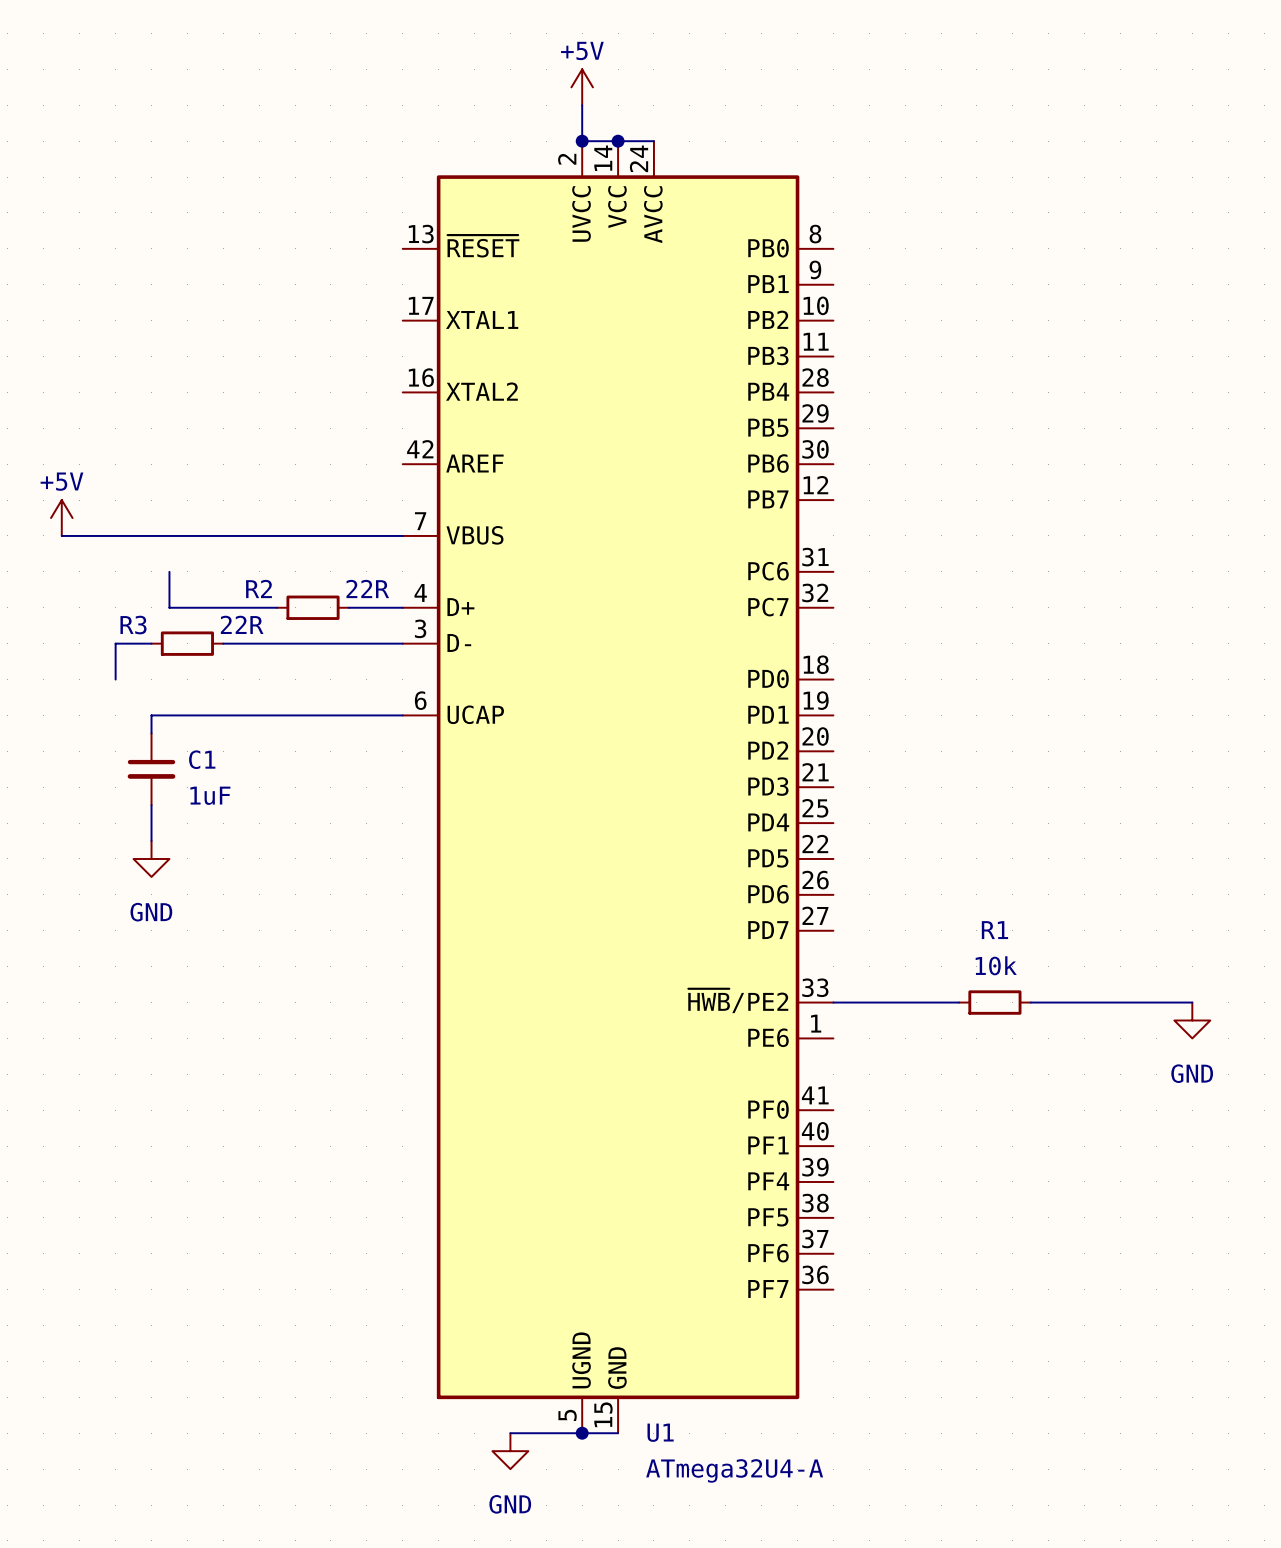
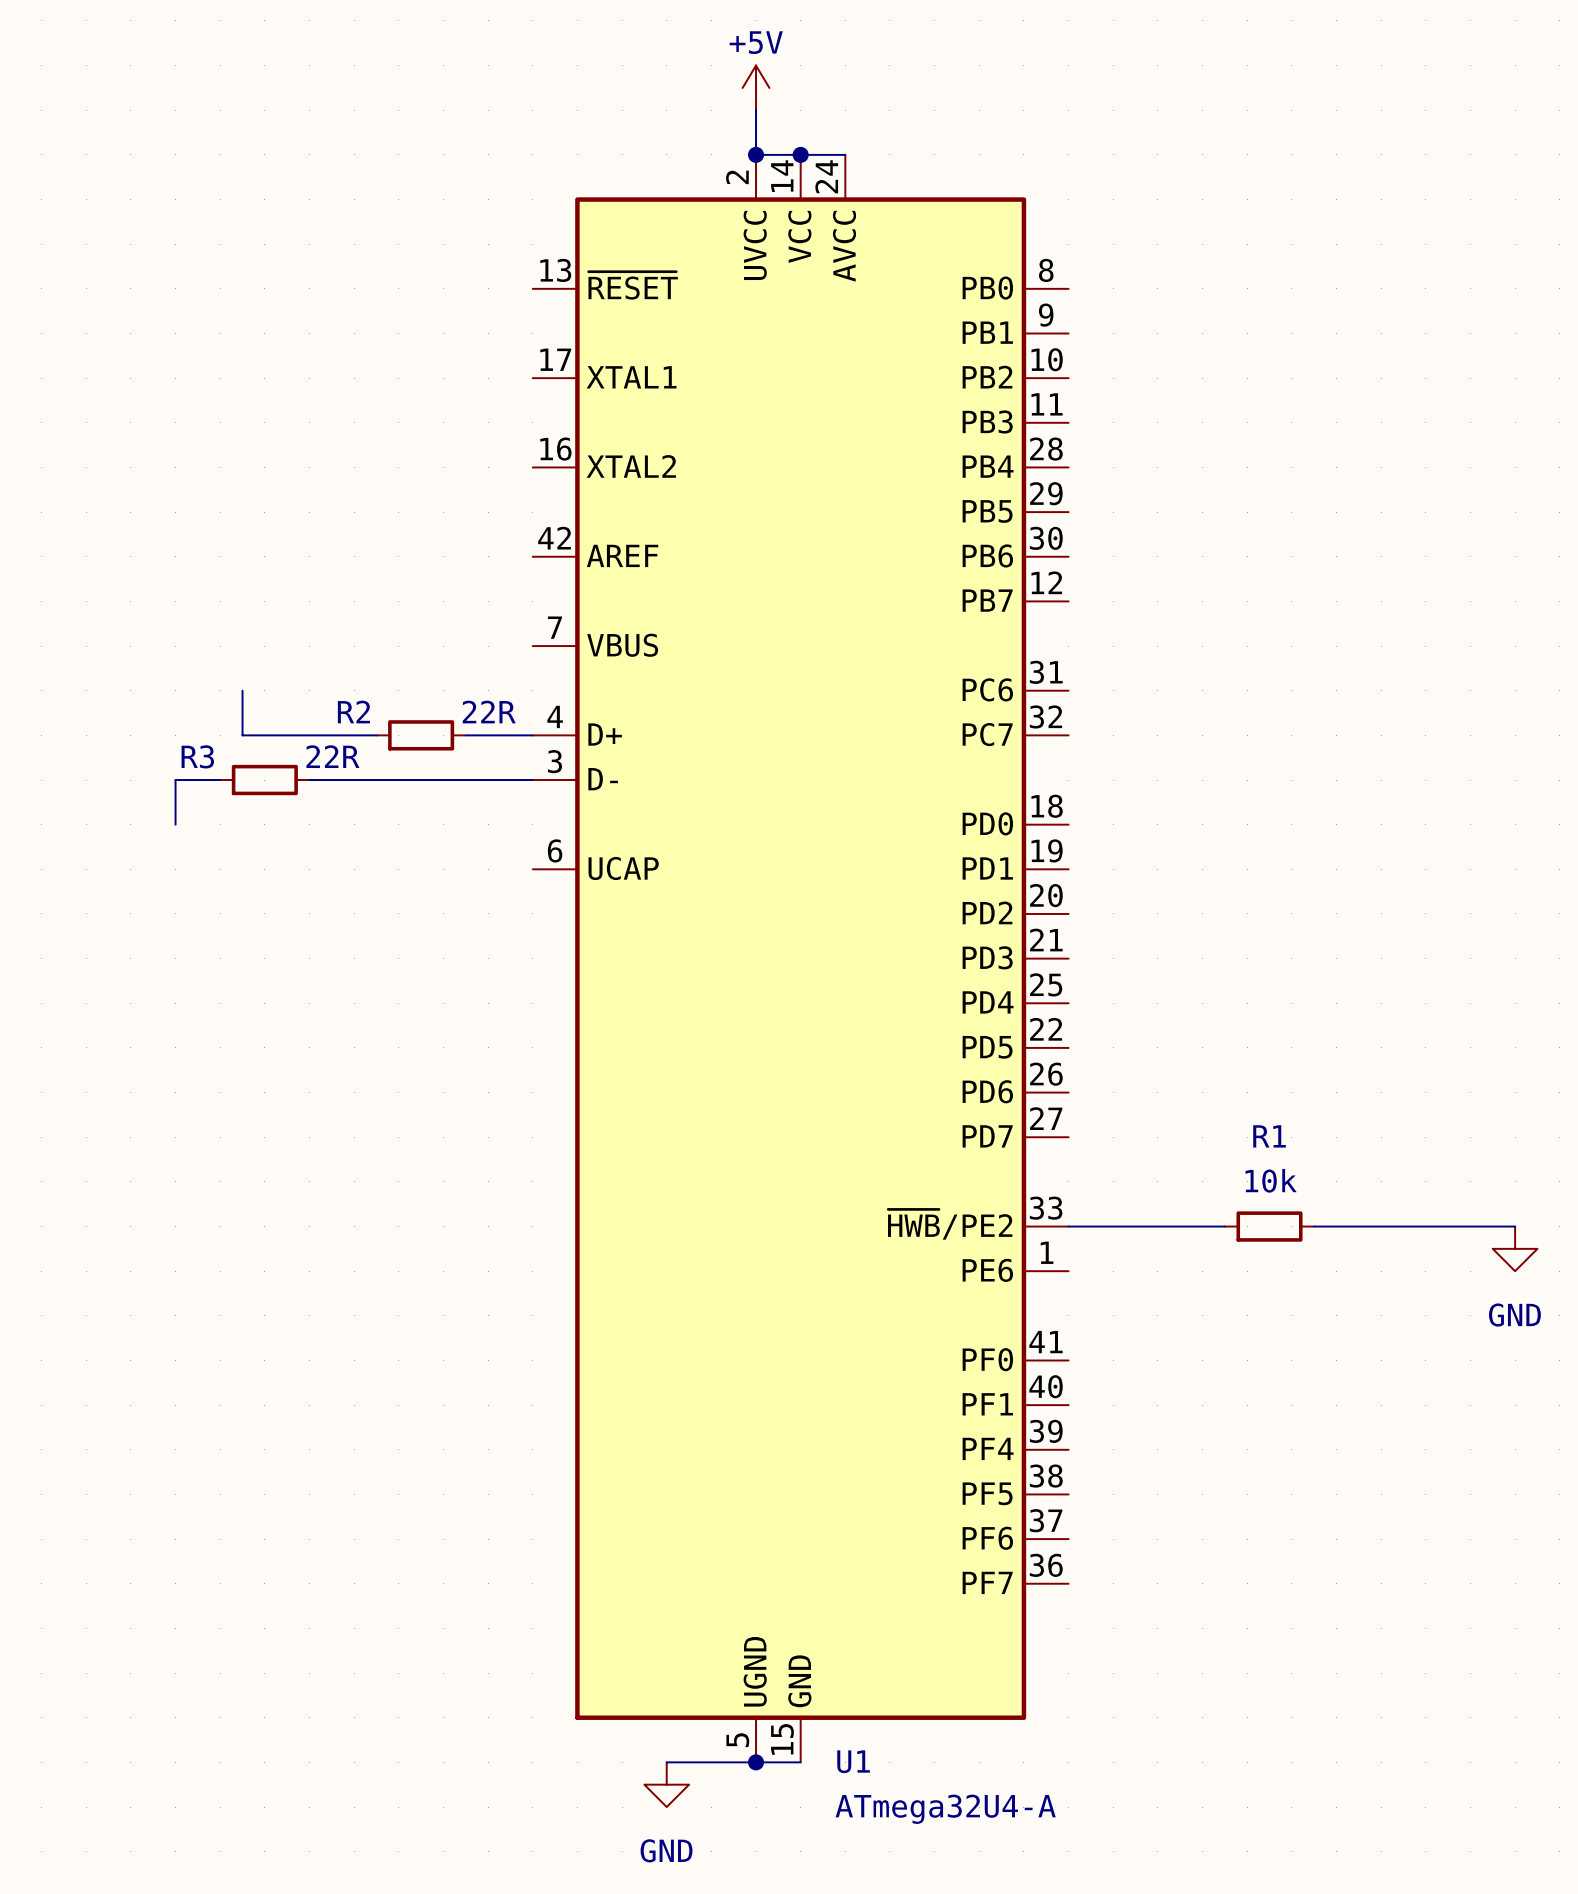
power symbol: +5V (61, 518) -> none
wire: (61, 535) (402, 535) -> none
wire: (402, 715) (151, 715) (151, 733) -> none
C1: 1uF (151, 769) -> none
wire: (151, 805) (151, 841) -> none
power symbol: GND (151, 858) -> none

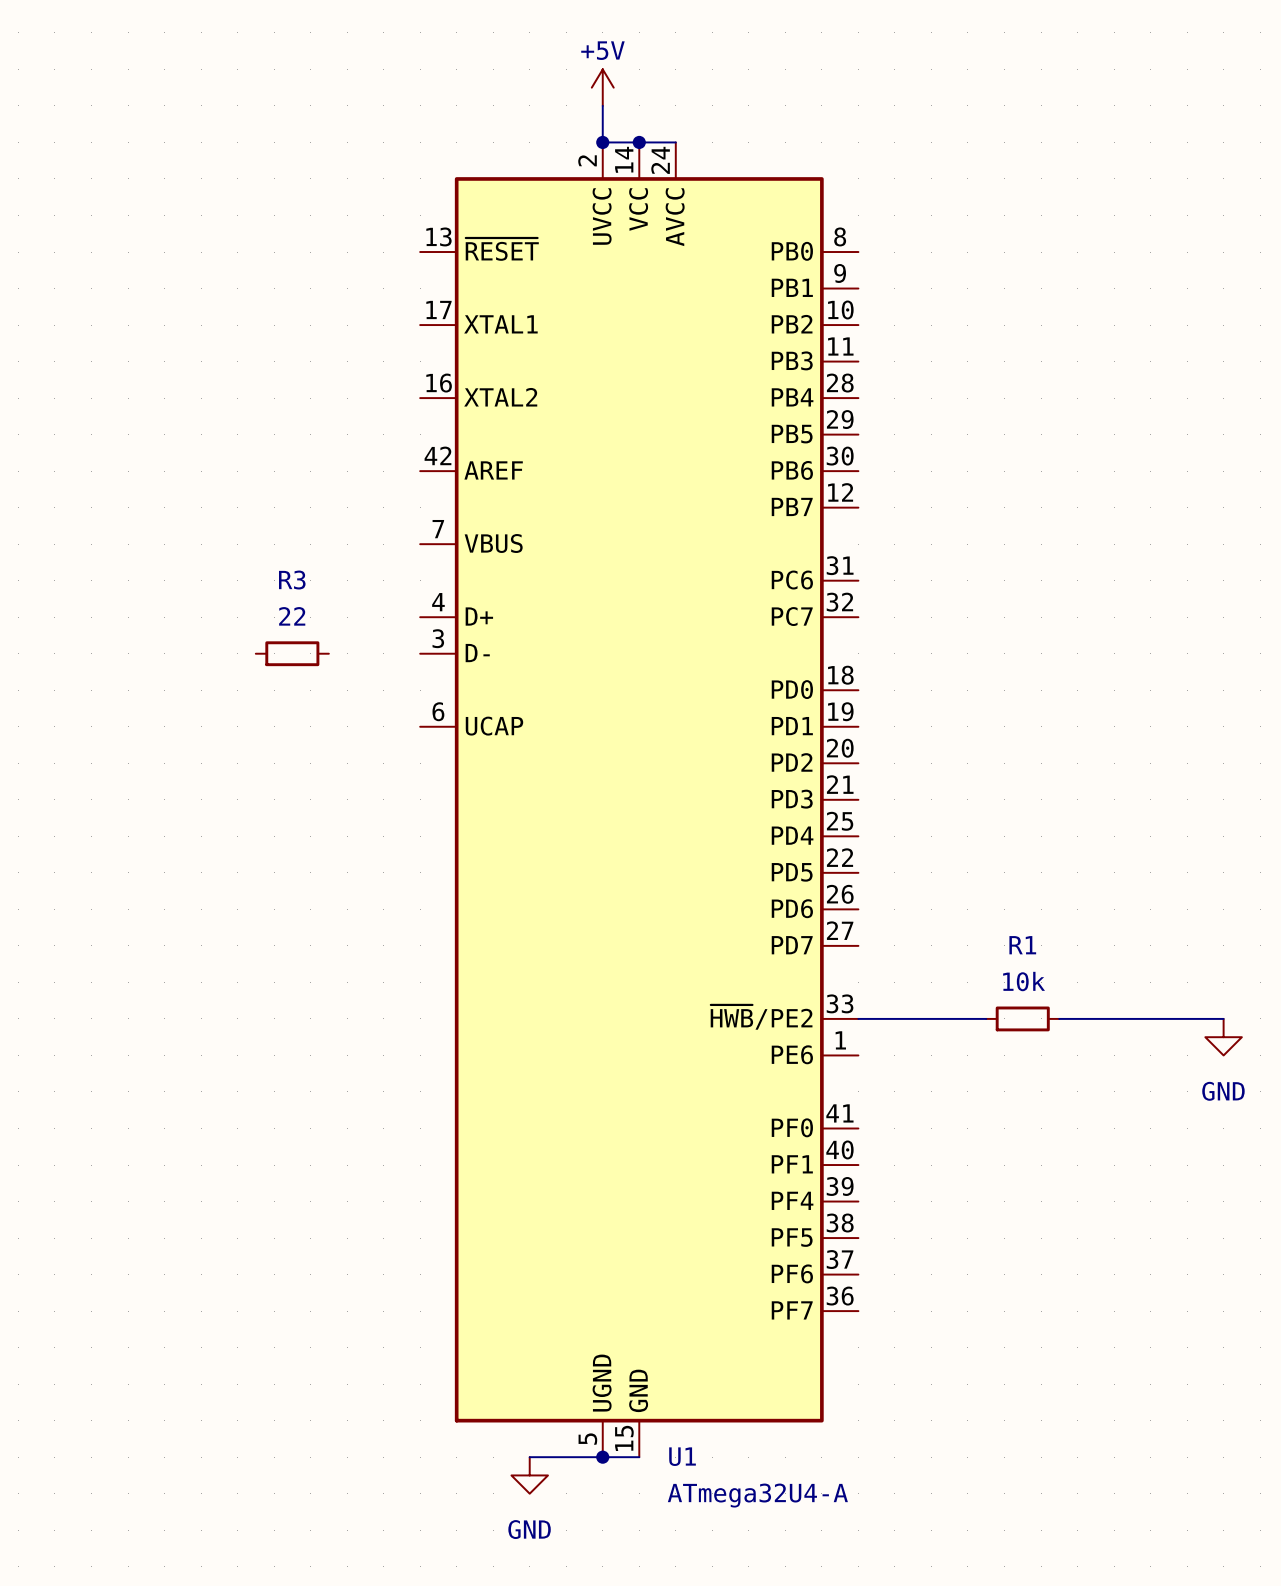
wire: (242, 690) (242, 735) (376, 735) -> none
R2: 22R (421, 735) -> none
wire: (465, 735) (532, 735) -> none
R3 name position: R3 (197, 756) -> R3 (292, 580)
R3 value: 22R (332, 756) -> 22 (292, 616)
wire: (220, 780) (175, 780) (175, 824) -> none
R3 position: (264, 780) -> (292, 653)
wire: (309, 780) (532, 780) -> none

